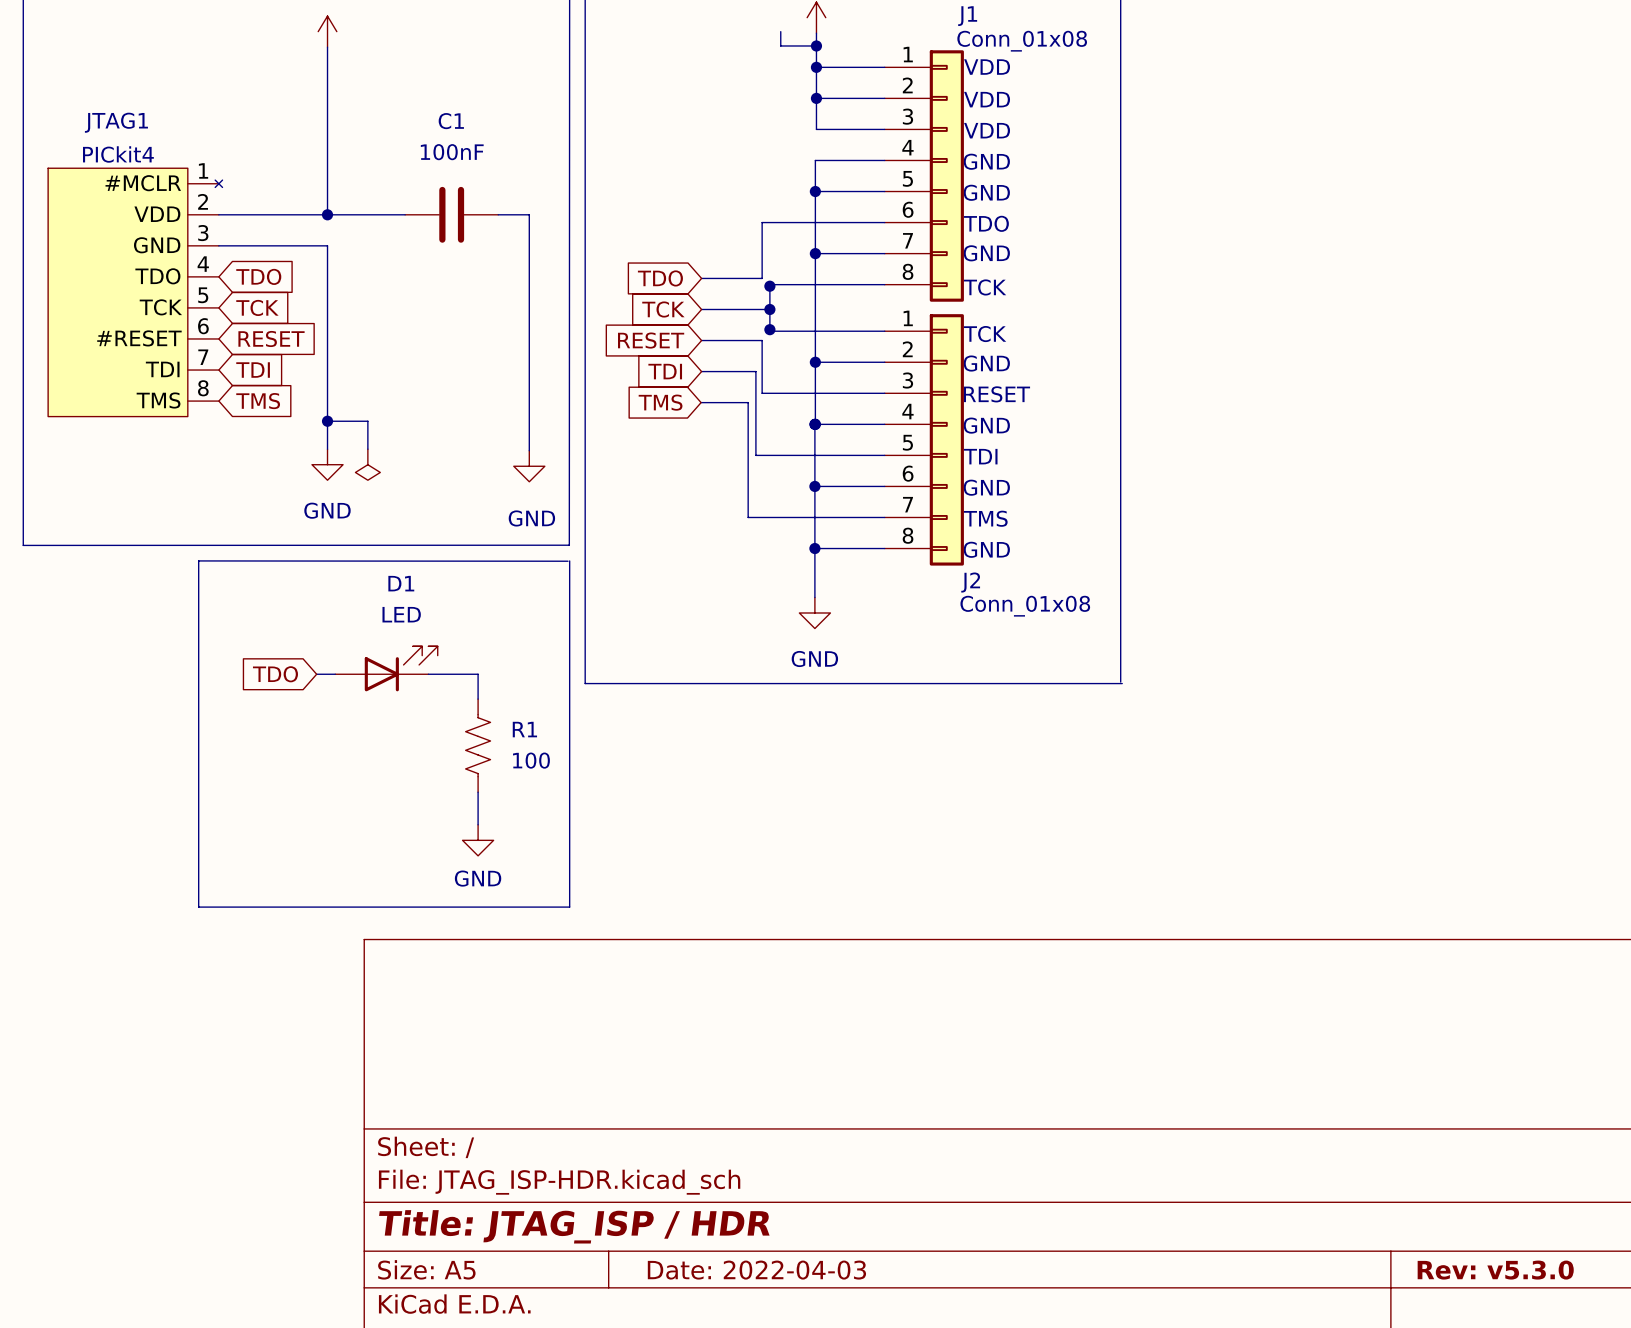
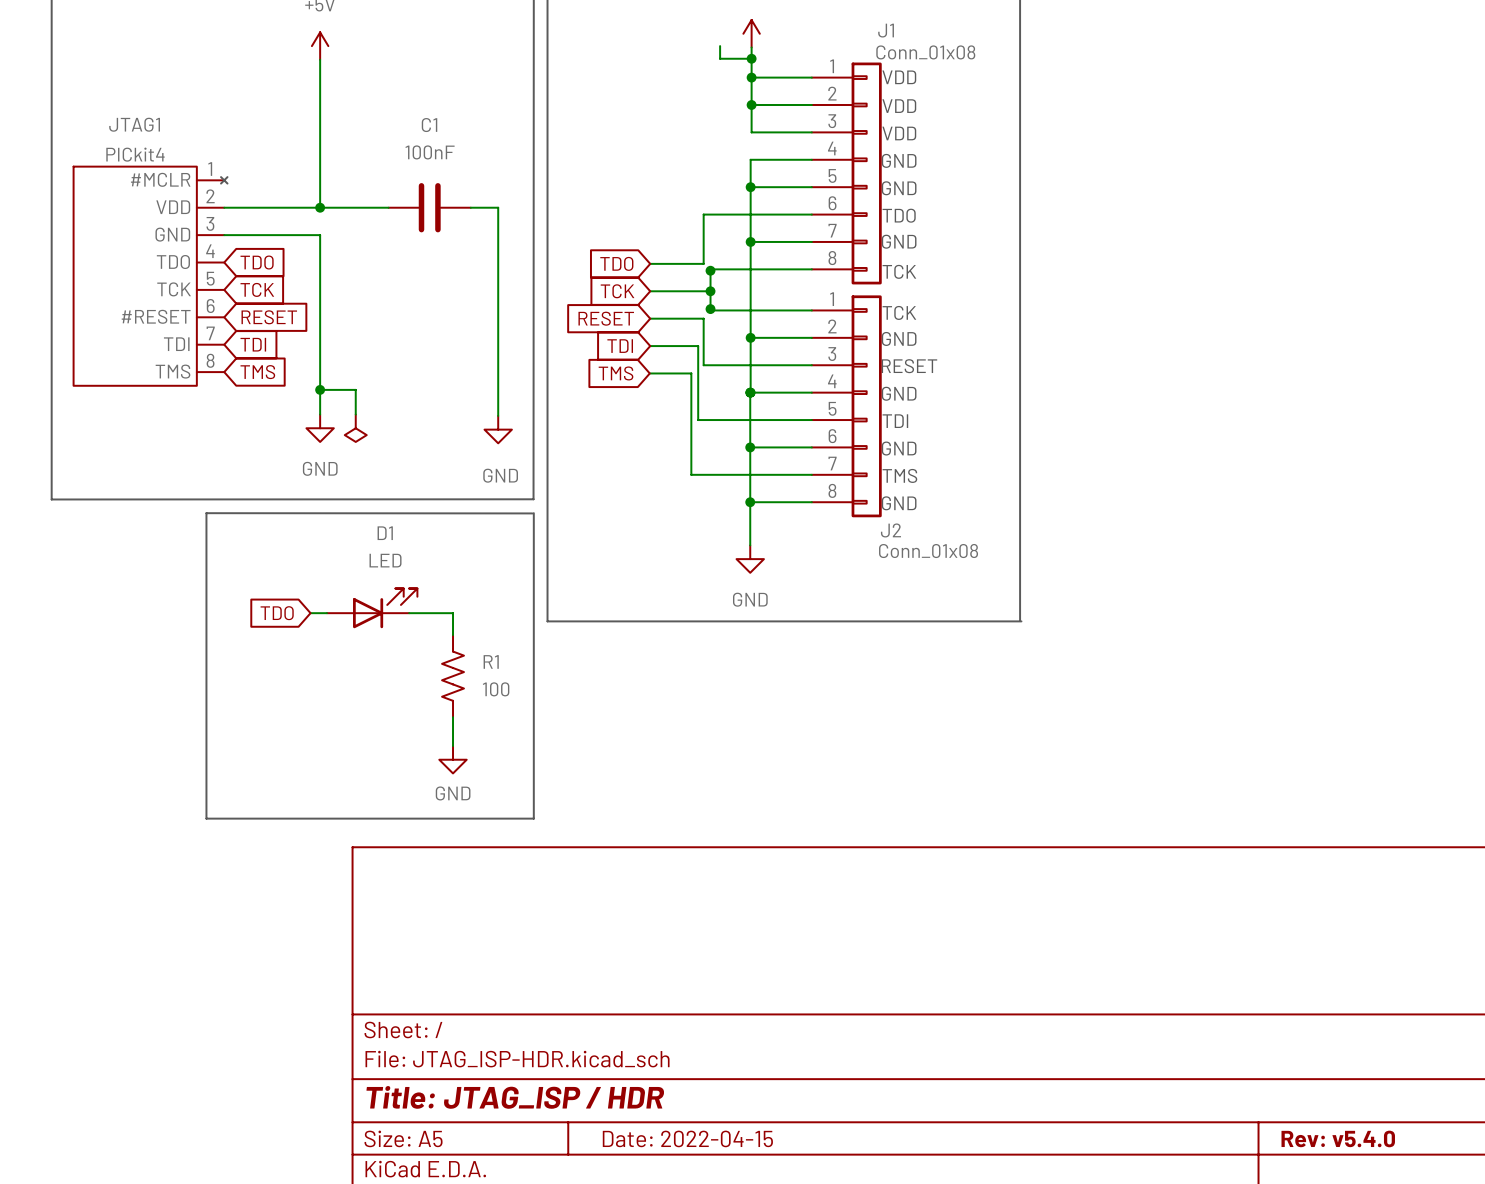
title block: Date: 2022-04-03 (756, 1270) -> Date: 2022-04-15 (687, 1138)
title block: Rev: v5.3.0 (1495, 1270) -> Rev: v5.4.0 (1338, 1138)

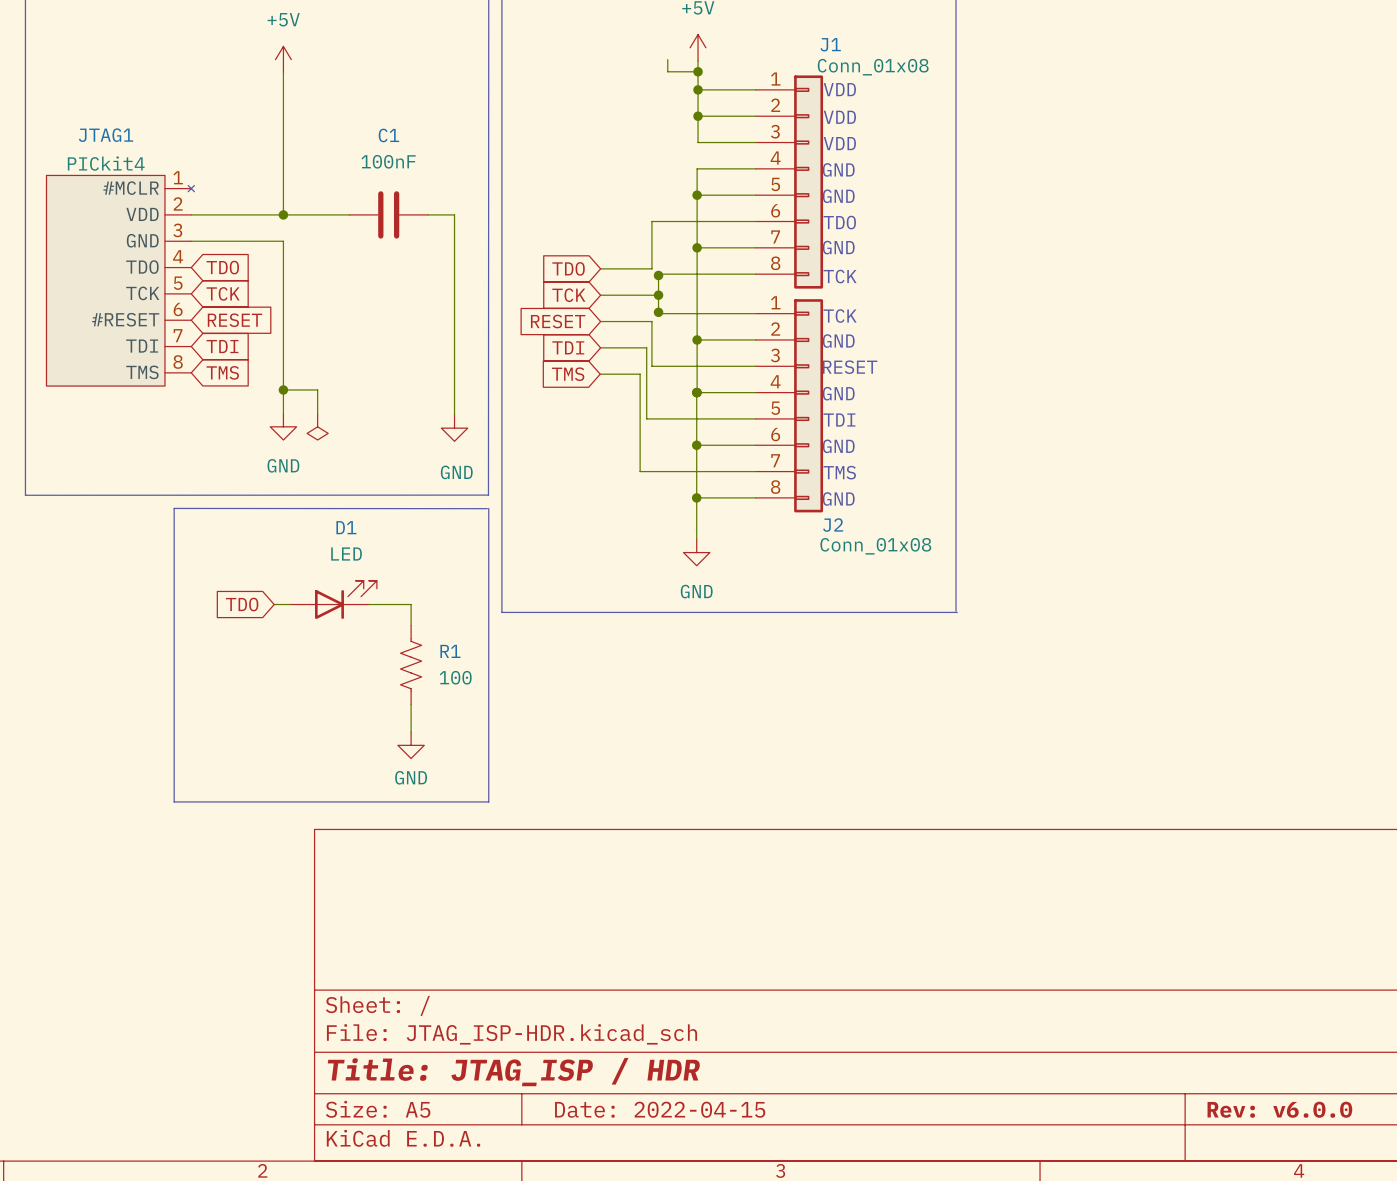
title block: Rev: v5.4.0 (1338, 1138) -> Rev: v6.0.0 (1279, 1109)

